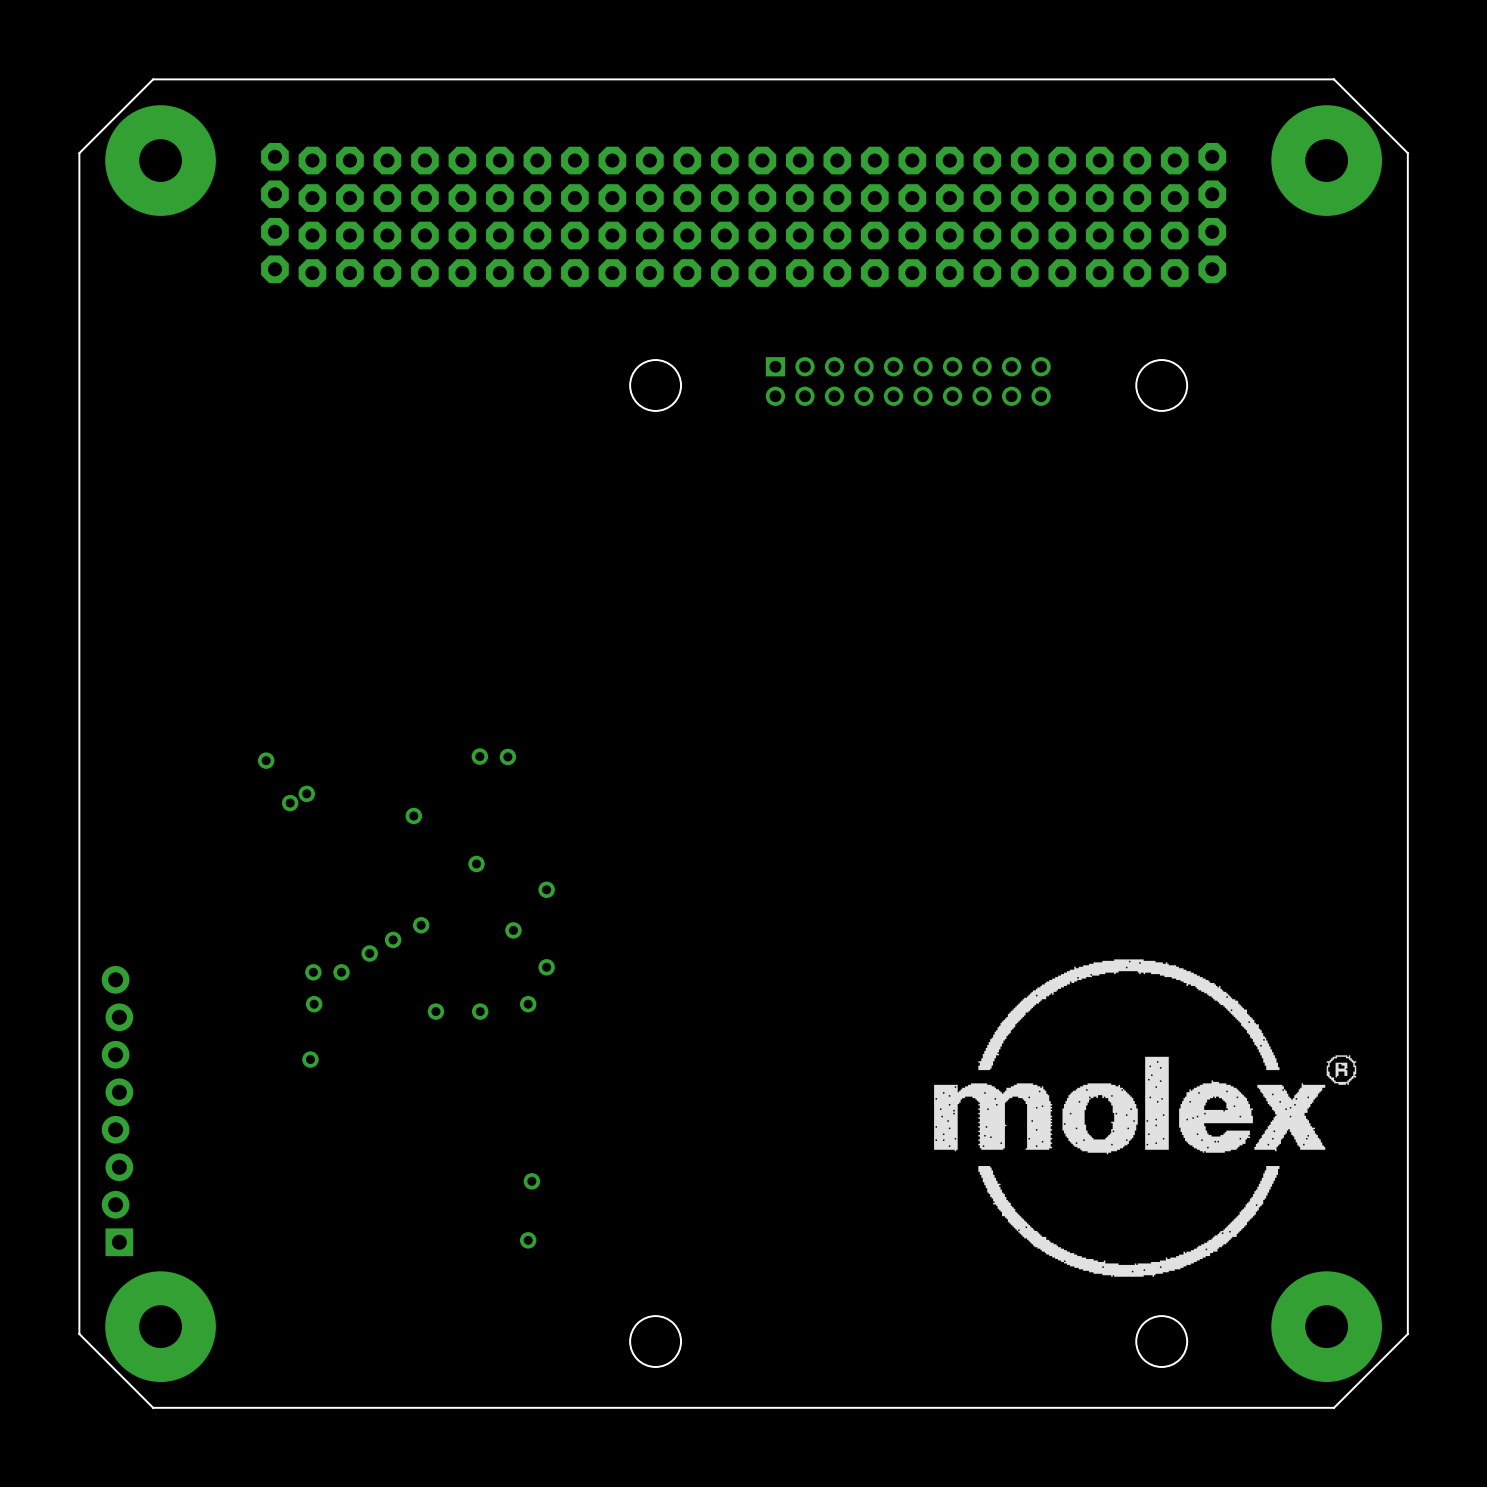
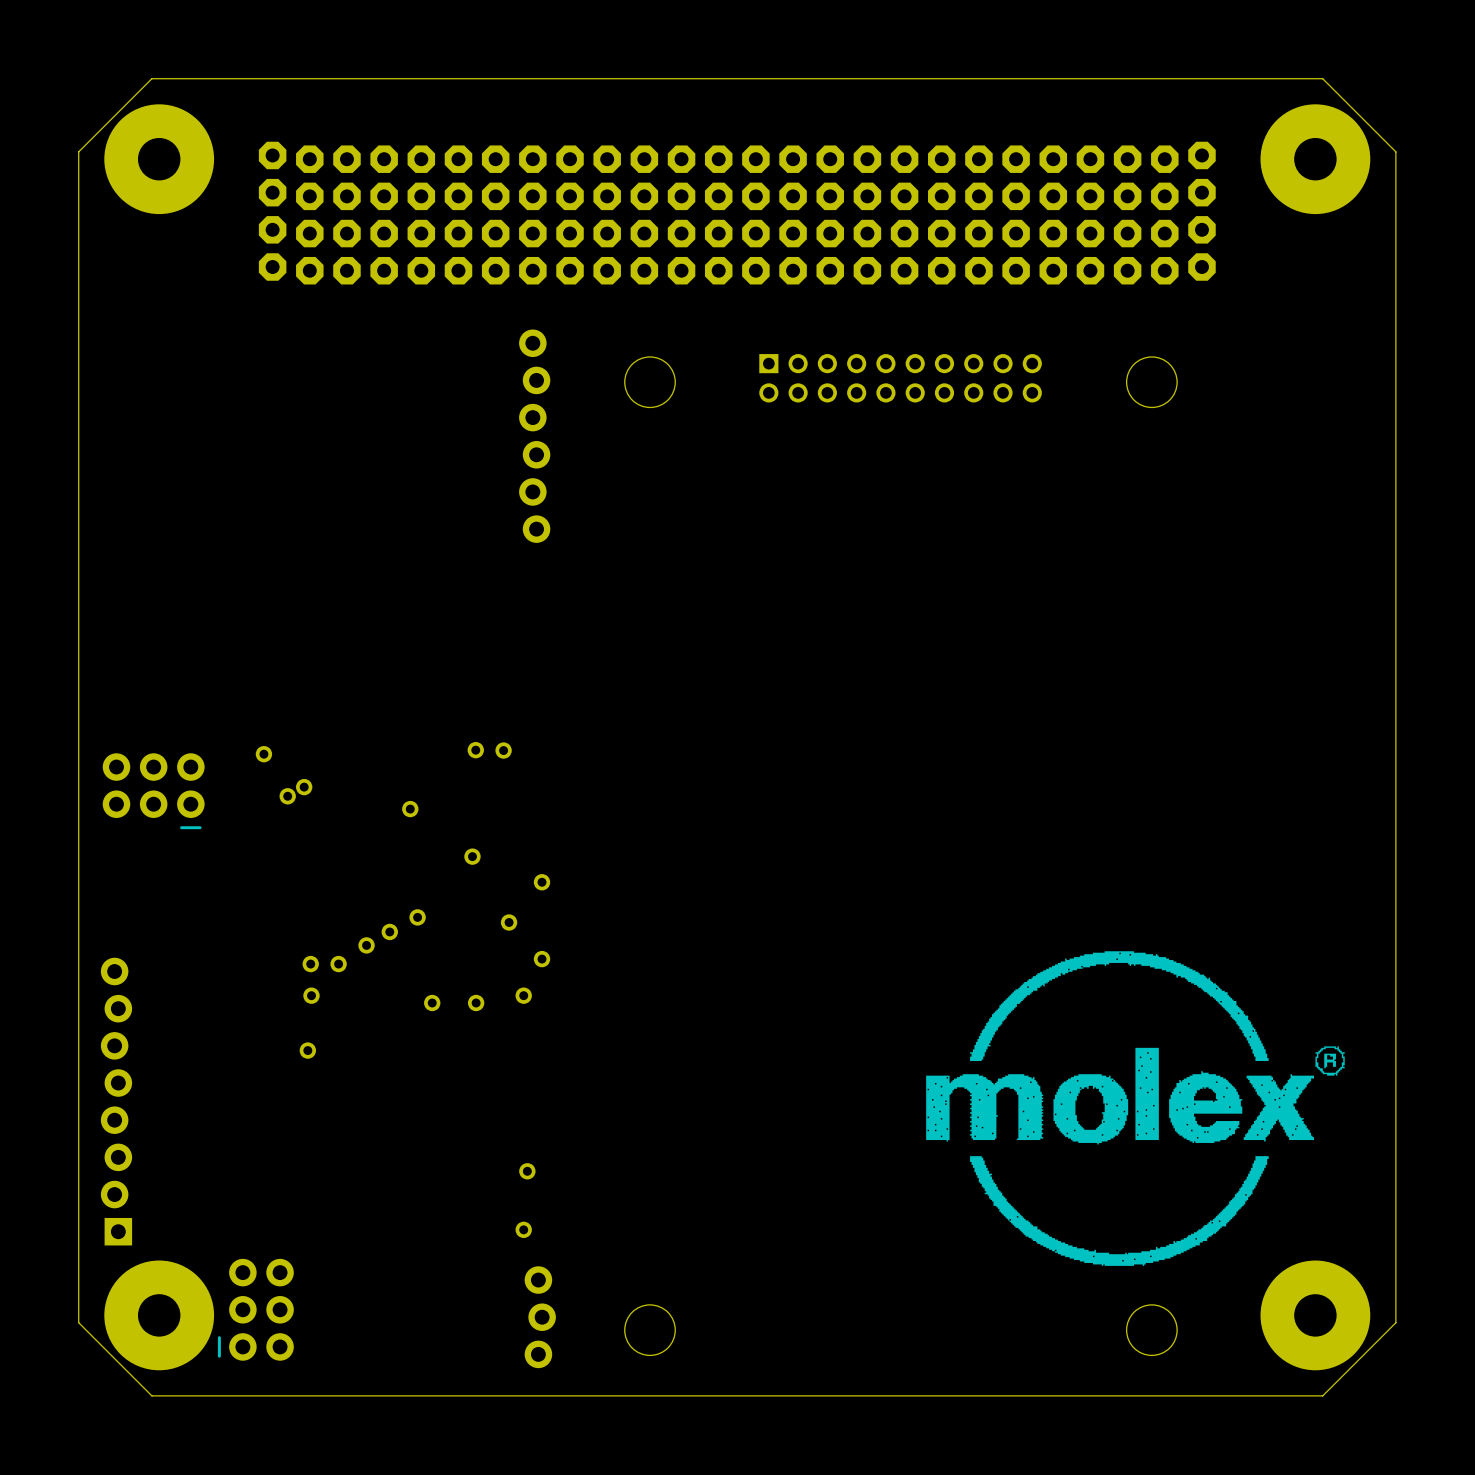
part: none -> (534, 436)
part: none -> (153, 791)
part: none -> (255, 1309)
part: none -> (540, 1317)

